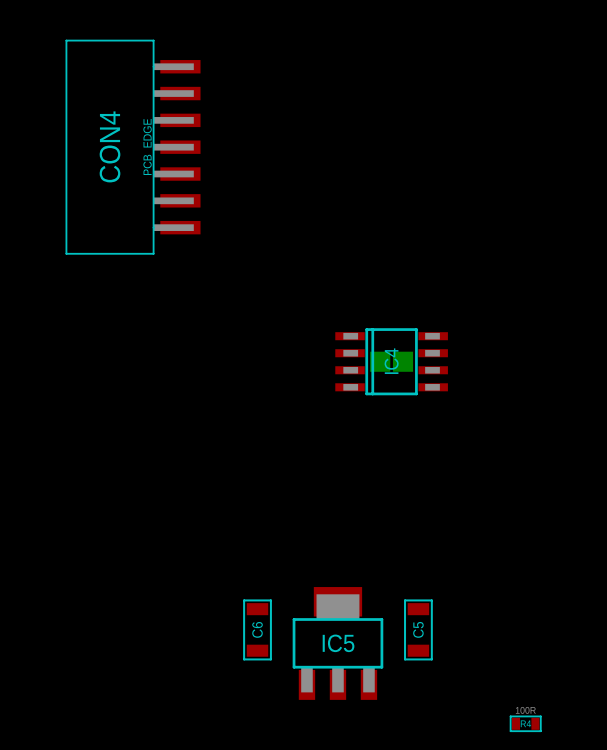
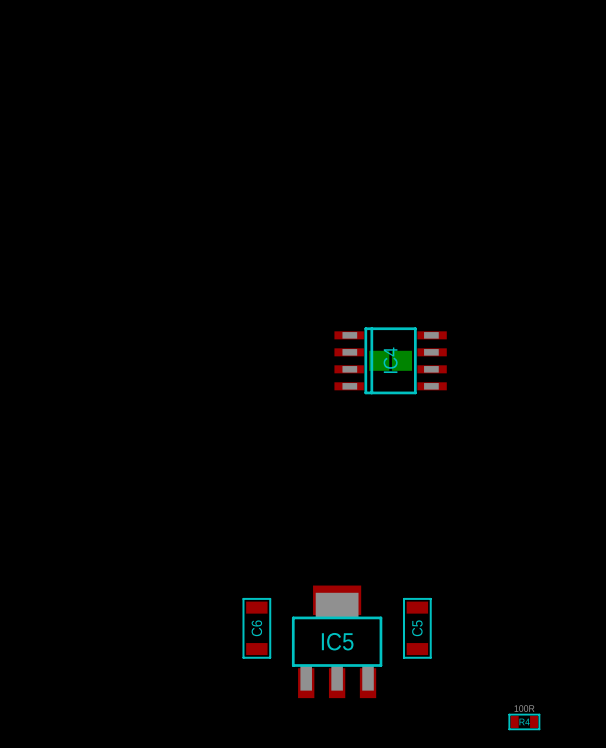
CON4: (133, 147) -> none

